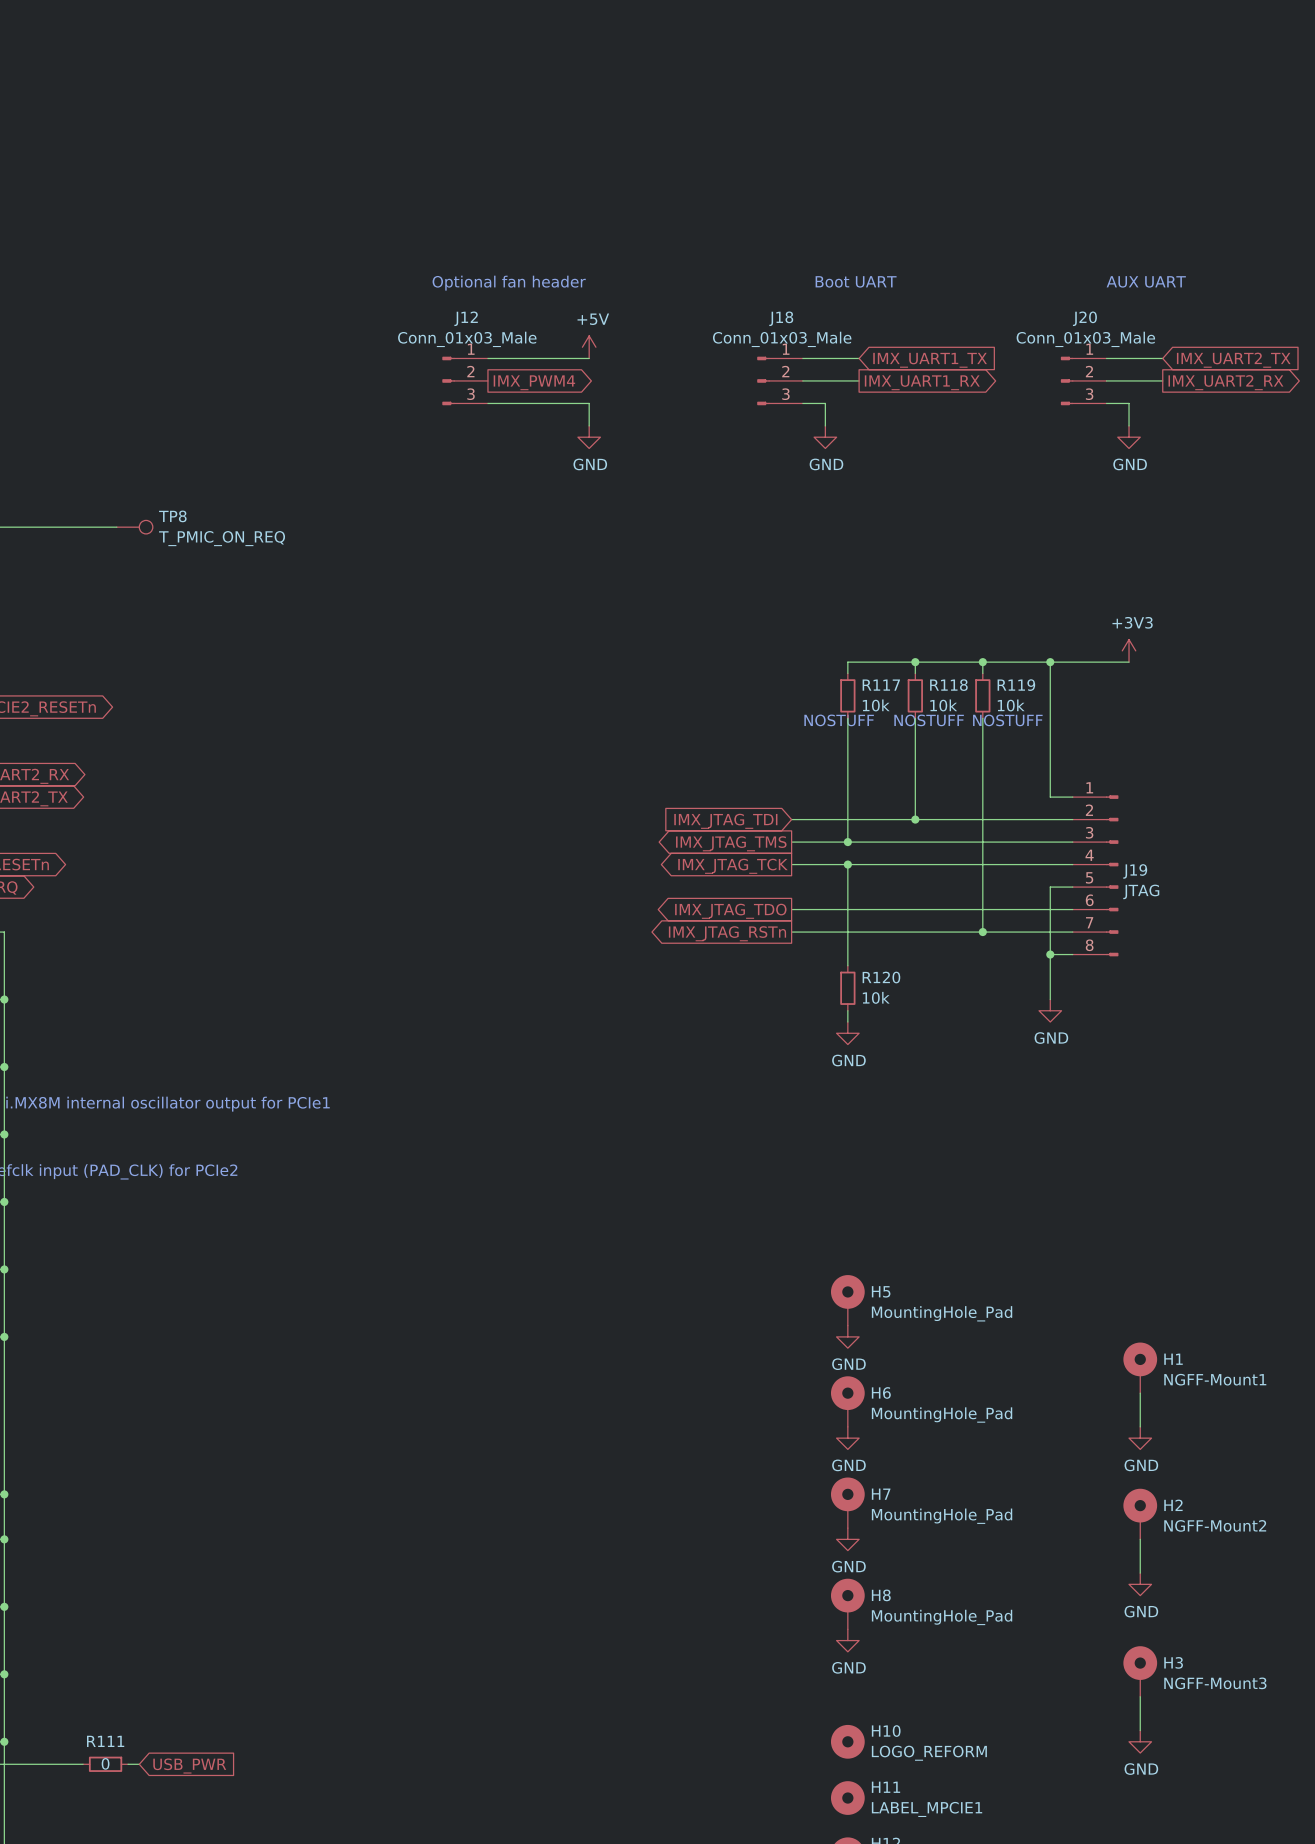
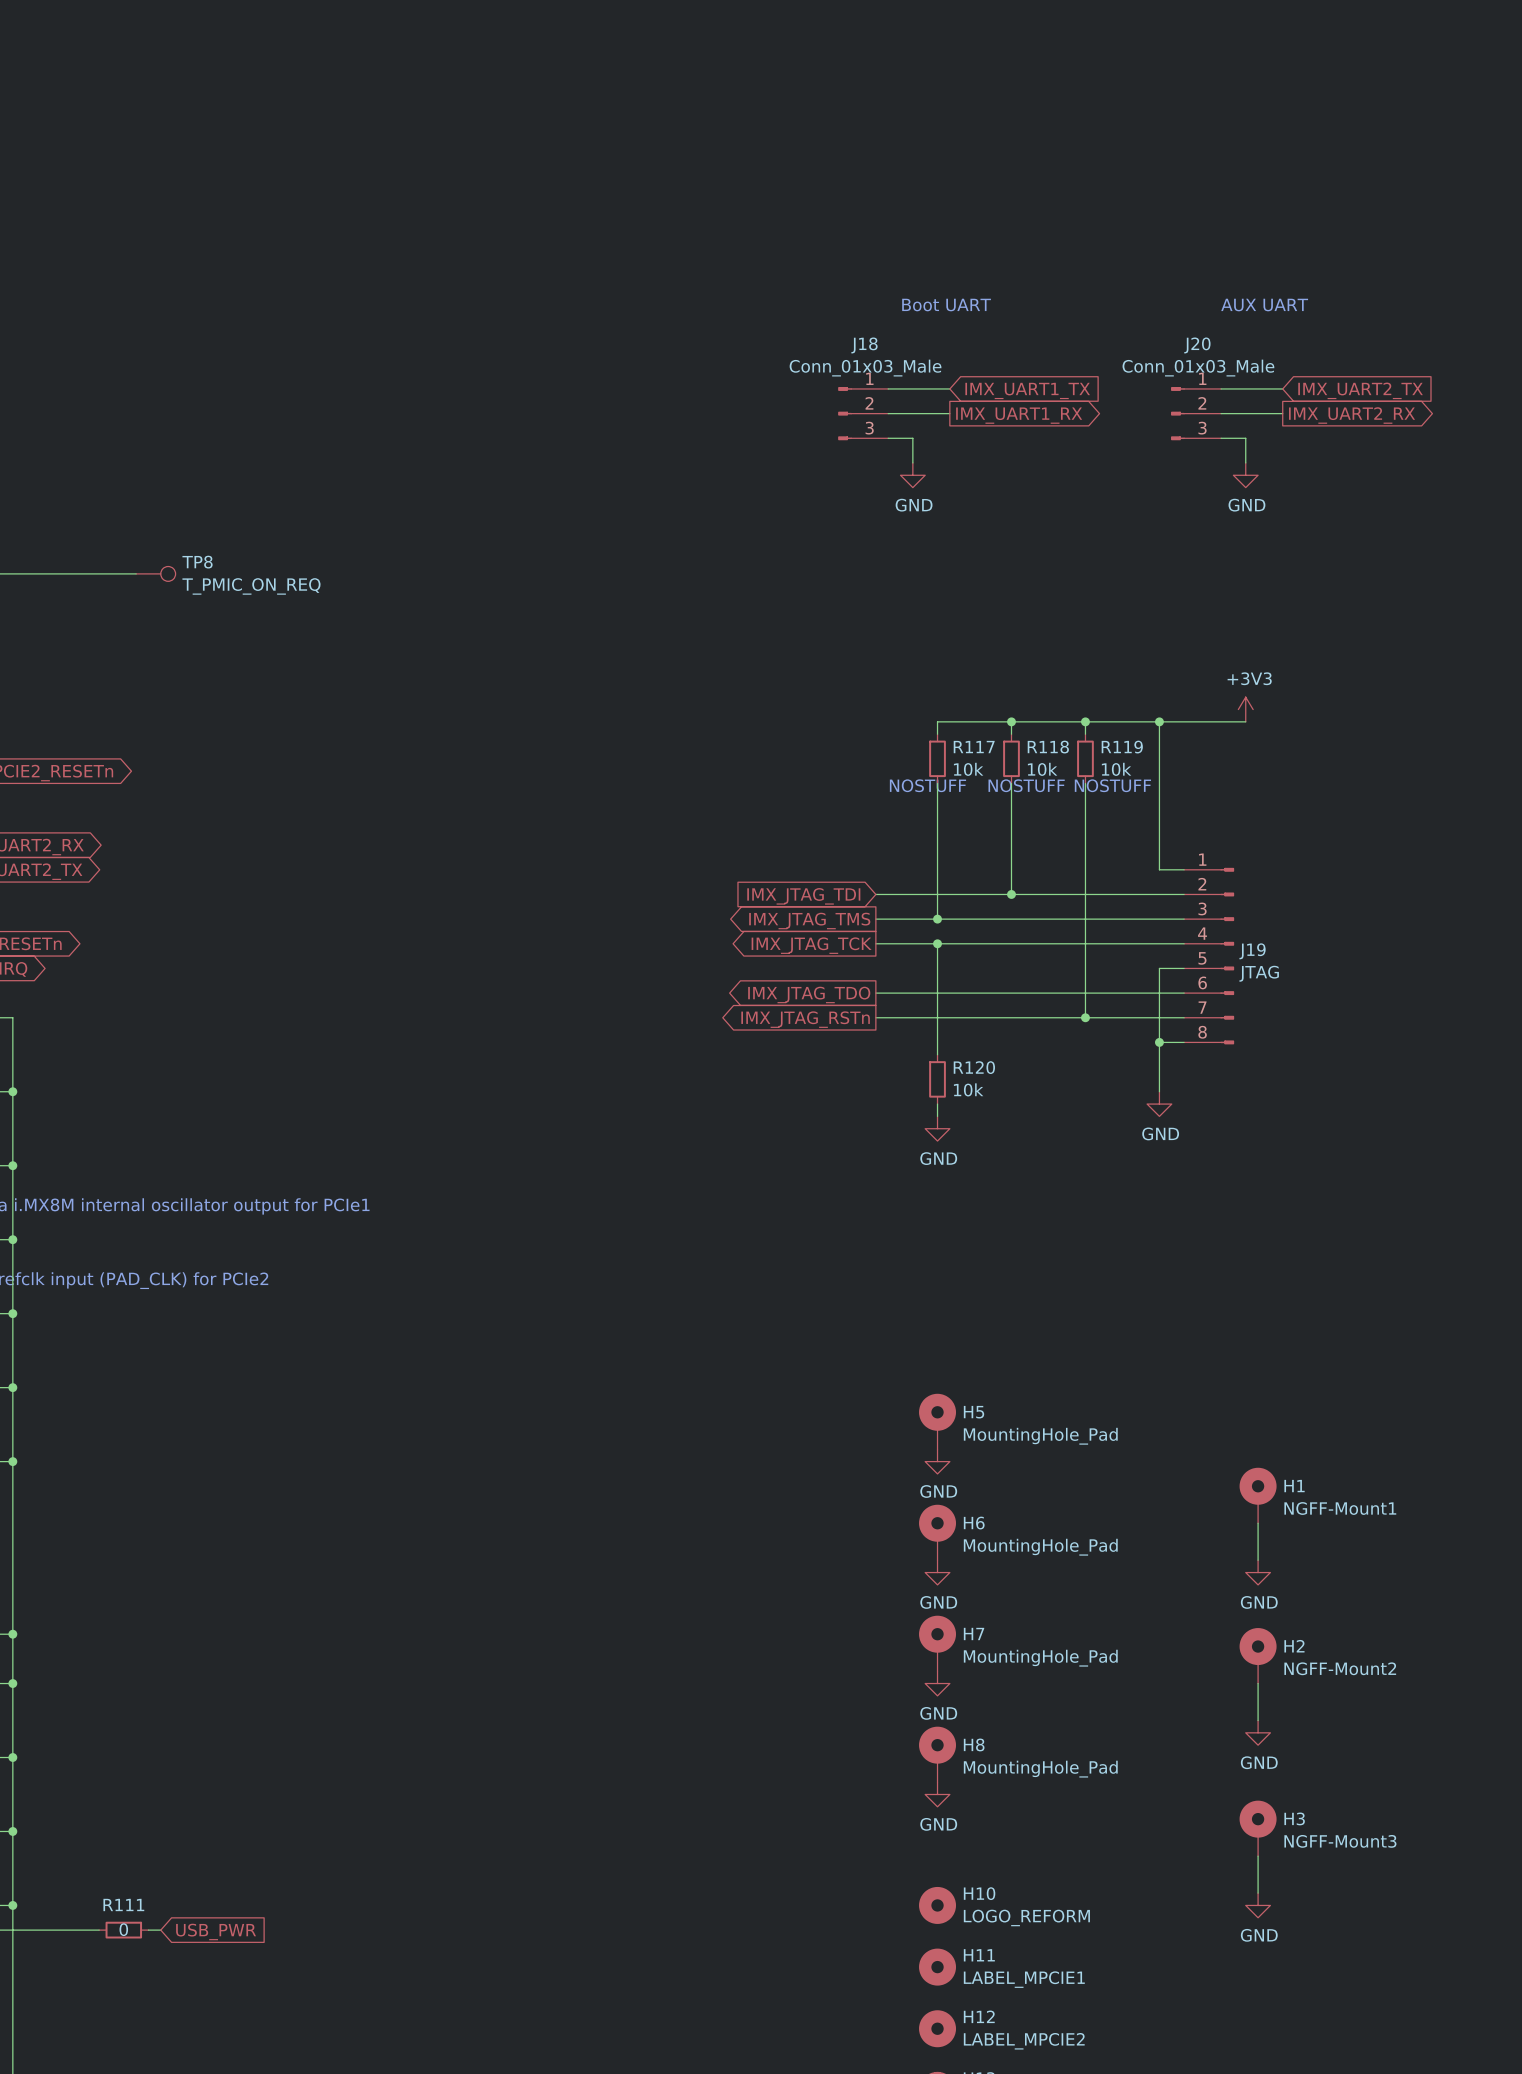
text: Optional fan header (509, 283) -> none
power symbol: +5V (589, 347) -> none
wire: (487, 358) (589, 358) -> none
J12: Conn_01x03_Male (465, 380) -> none
global label: IMX_PWM4 (534, 382) -> none
wire: (487, 403) (589, 403) (589, 425) -> none
power symbol: GND (589, 437) -> none

